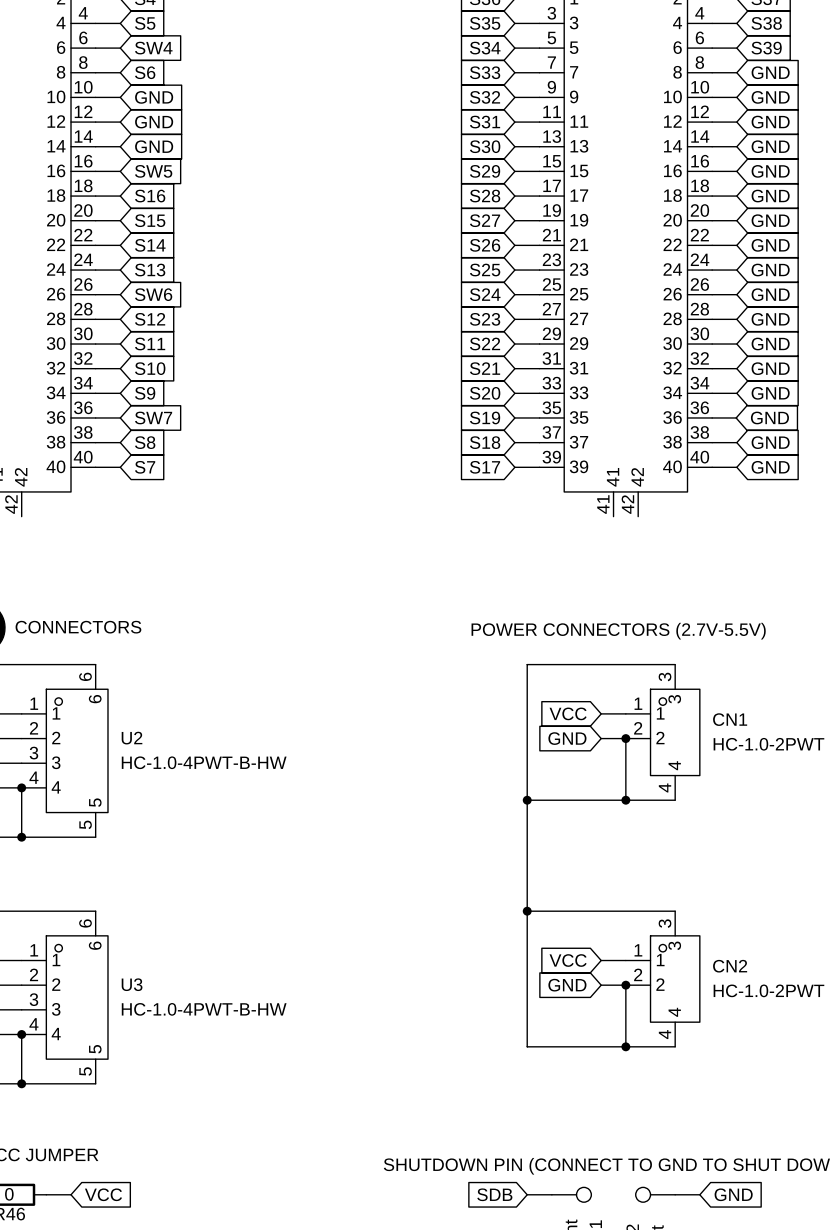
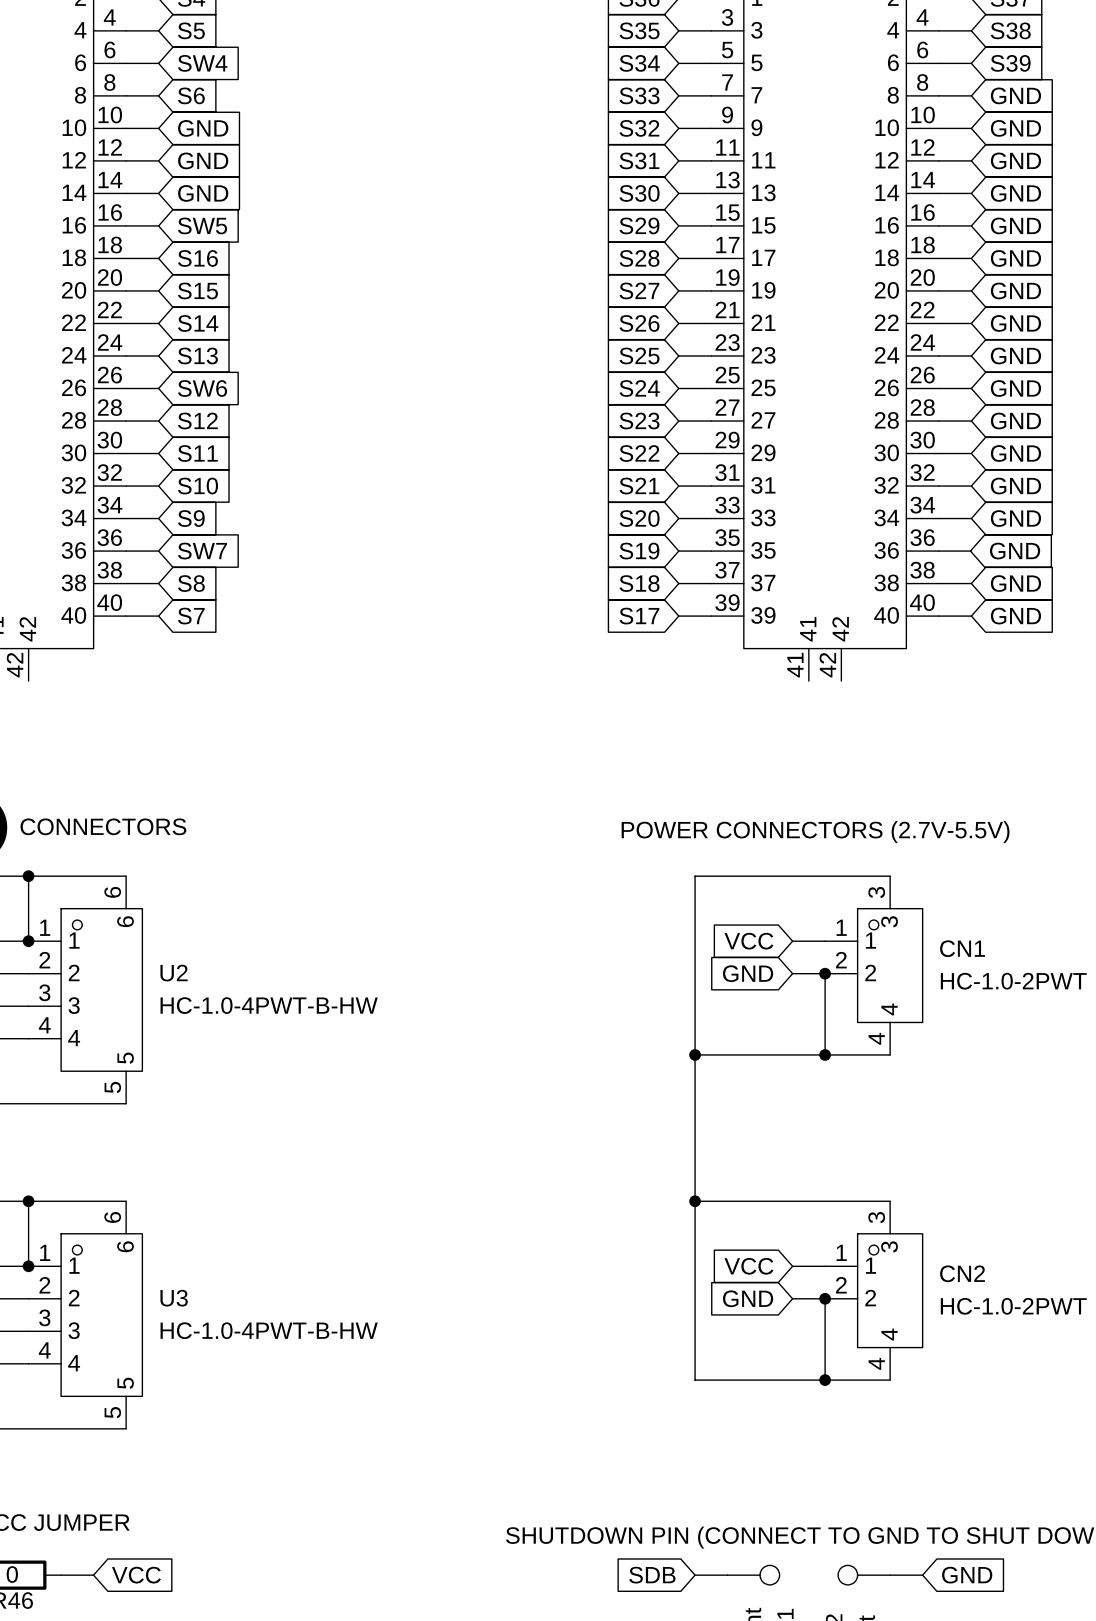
junction: none -> (28, 876)
junction: none -> (28, 941)
wire: (21, 787) (21, 837) -> (28, 876) (28, 941)
junction: (21, 787) -> none
junction: (21, 837) -> none
junction: none -> (28, 1201)
junction: none -> (28, 1266)
wire: (21, 1034) (21, 1083) -> (28, 1201) (28, 1266)
junction: (21, 1034) -> none
junction: (21, 1083) -> none

